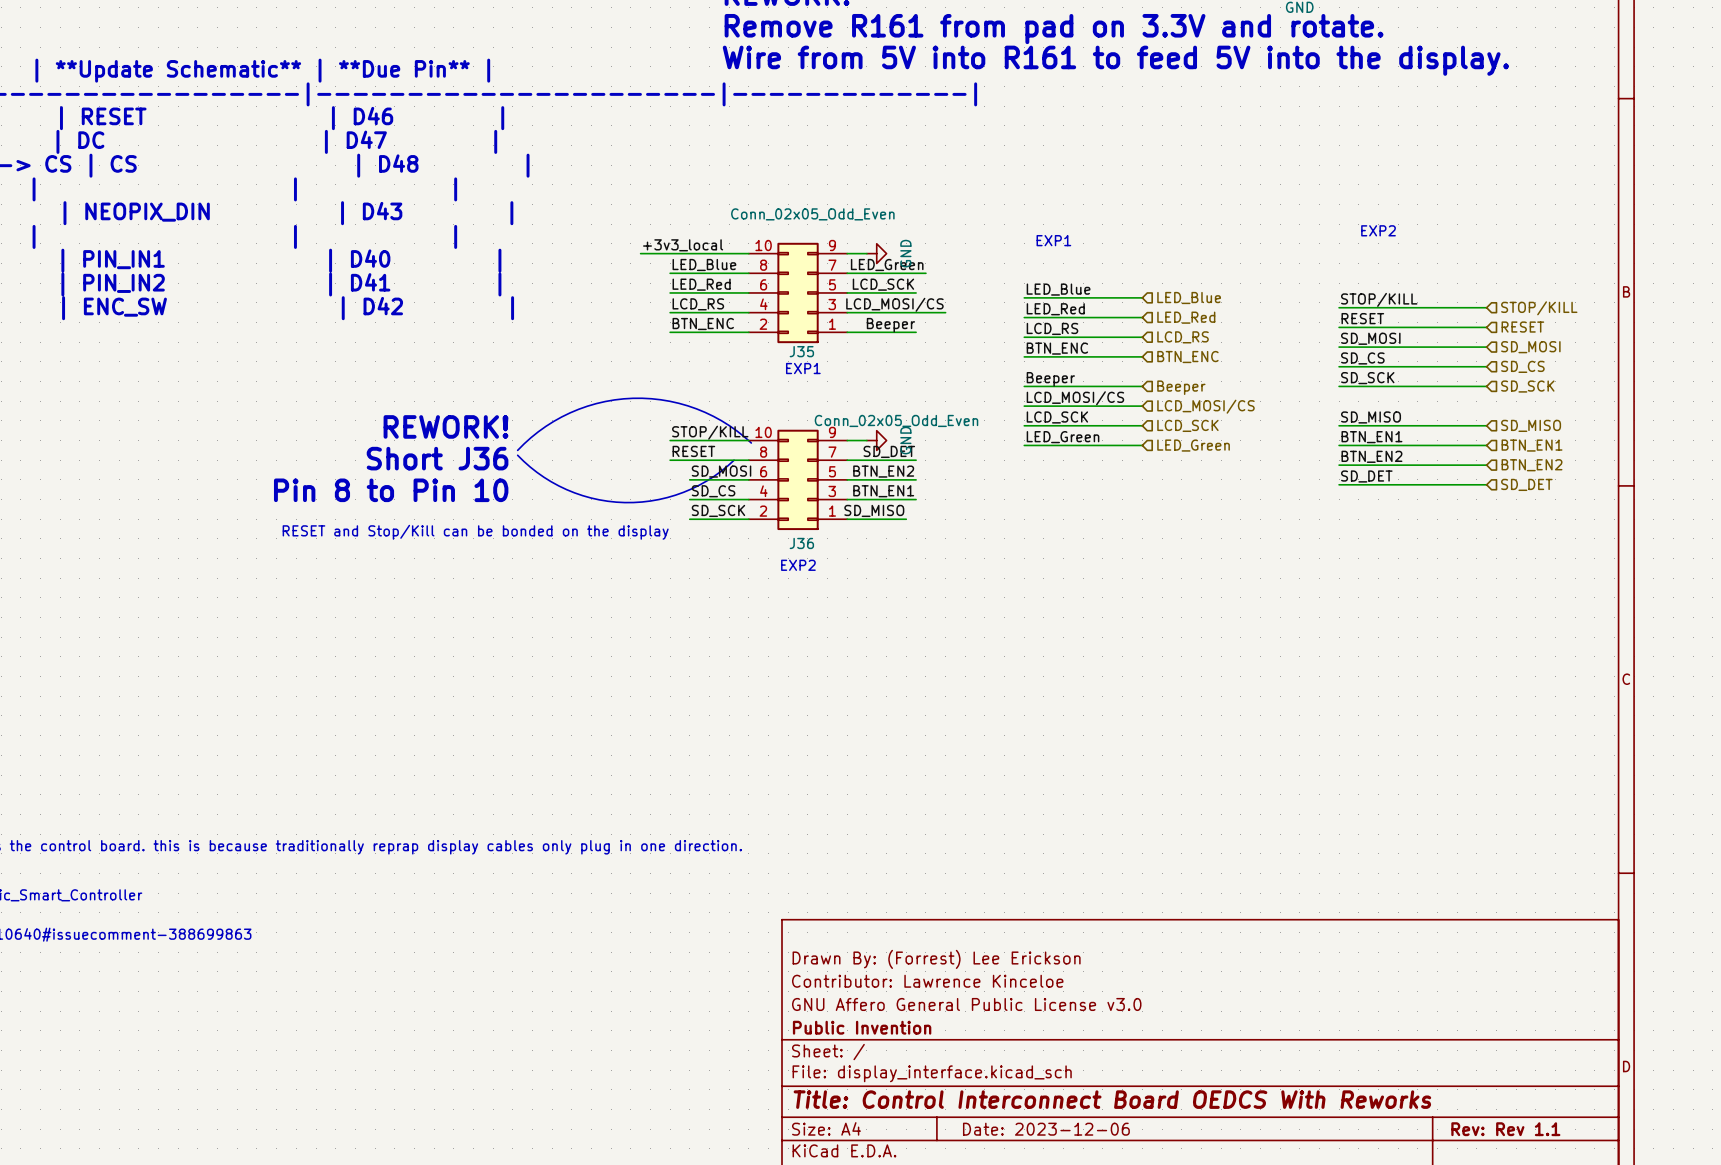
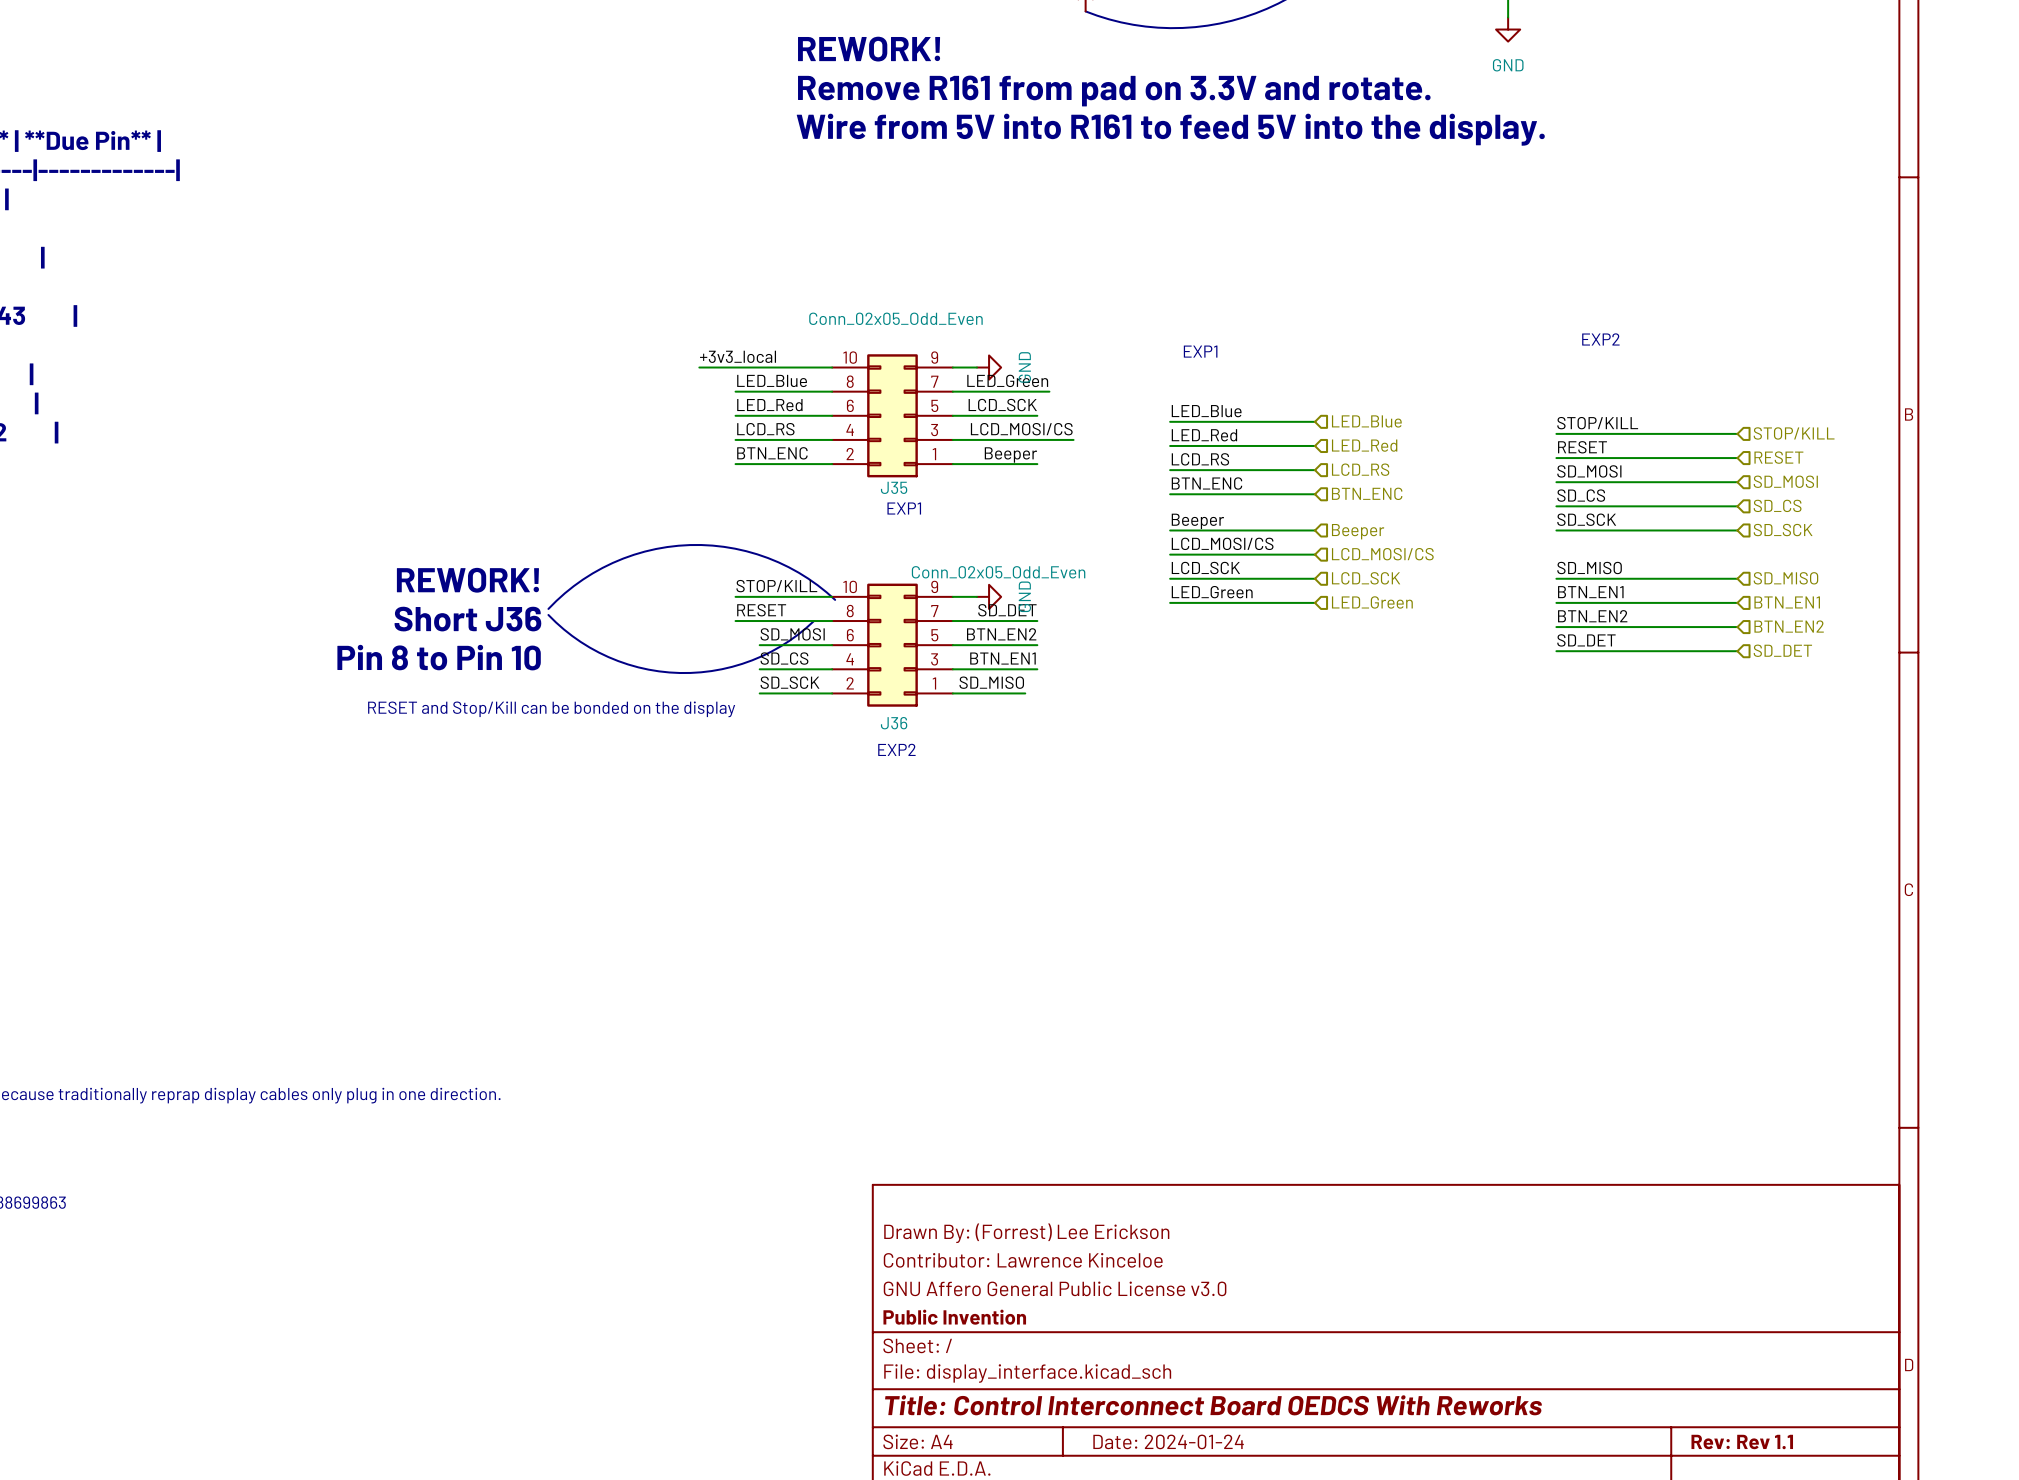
title block: Date: 2023-12-06 (1046, 1129) -> Date: 2024-01-24 (1168, 1441)

